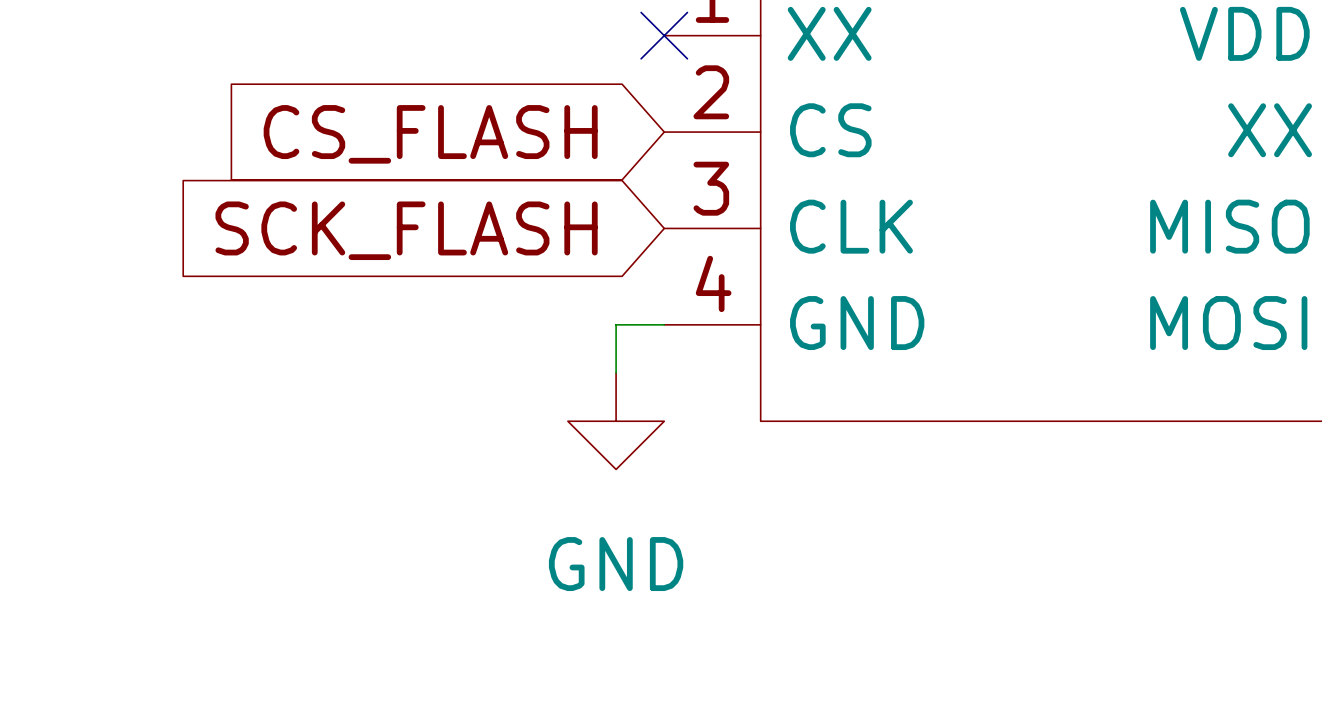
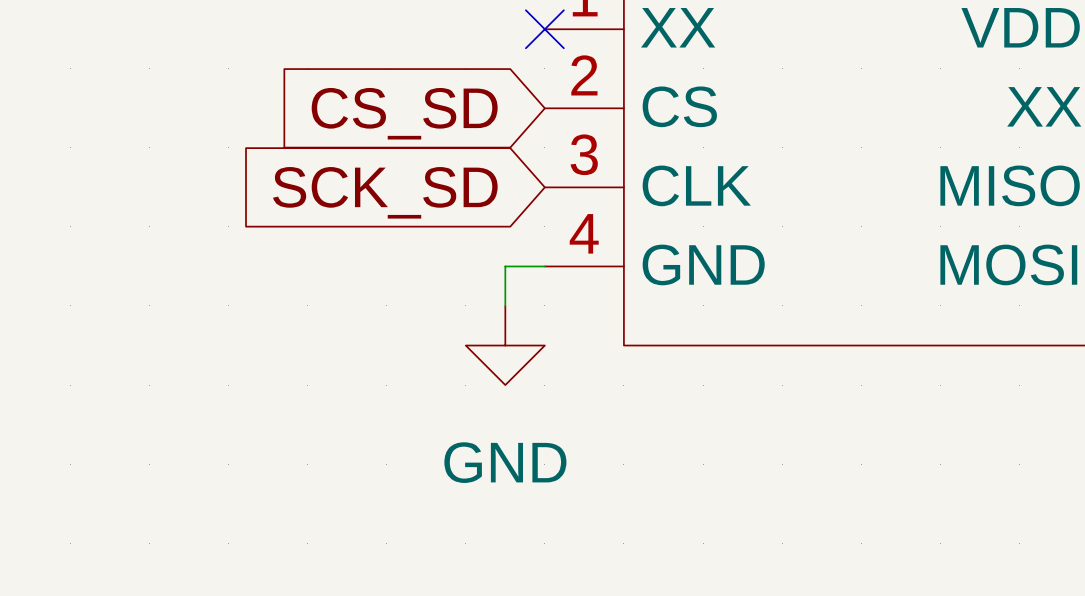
global label: CS_FLASH (430, 134) -> CS_SD (404, 113)
global label: SCK_FLASH (406, 230) -> SCK_SD (385, 192)

